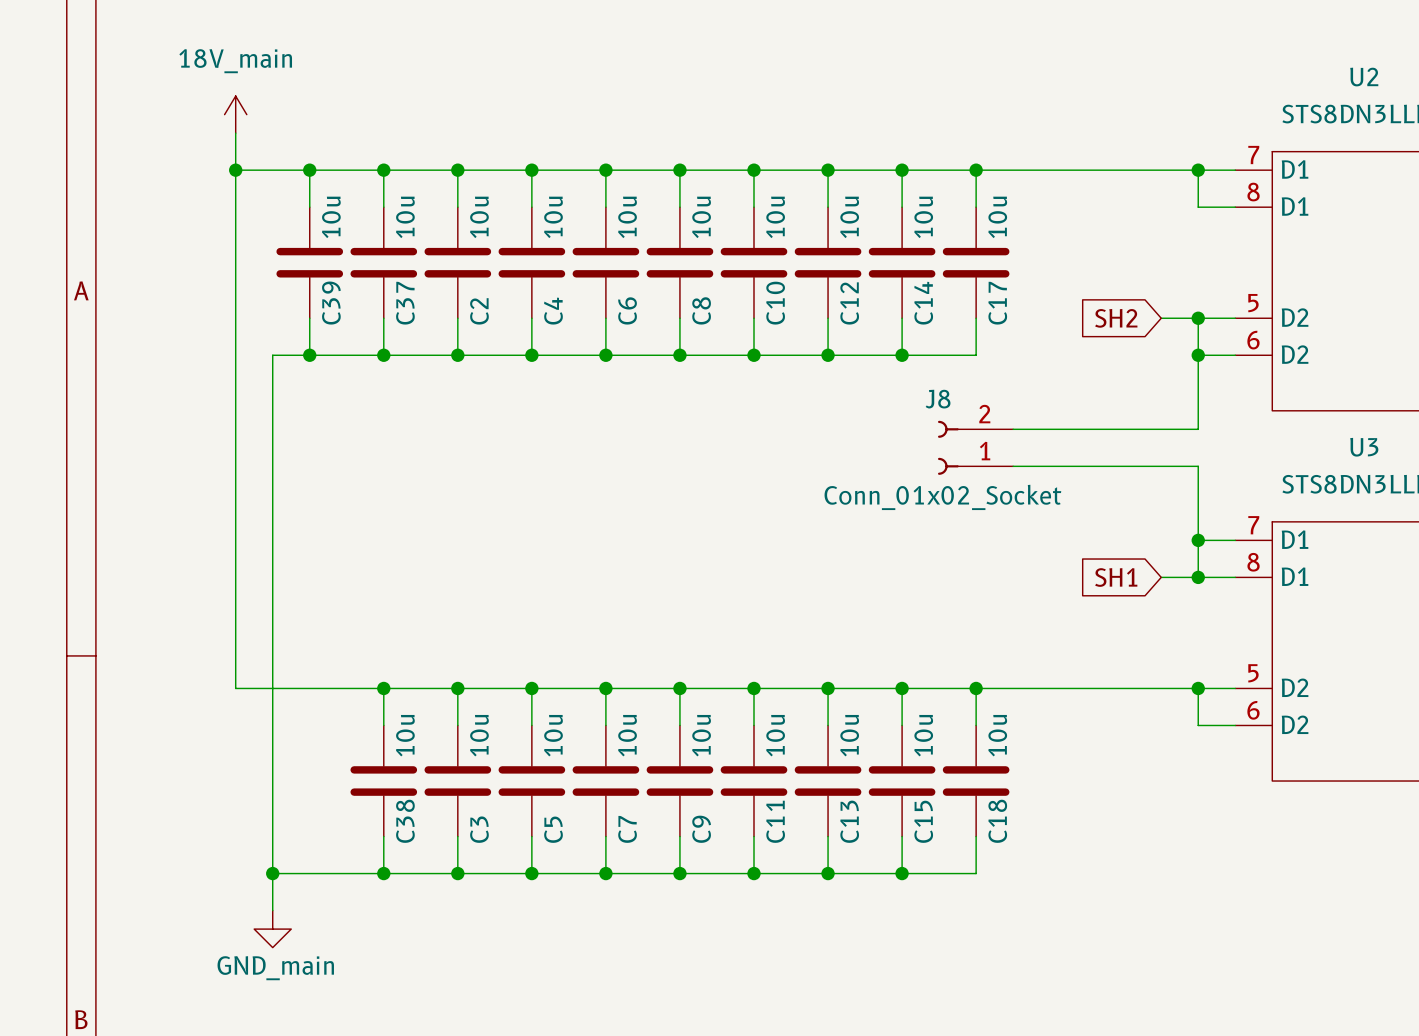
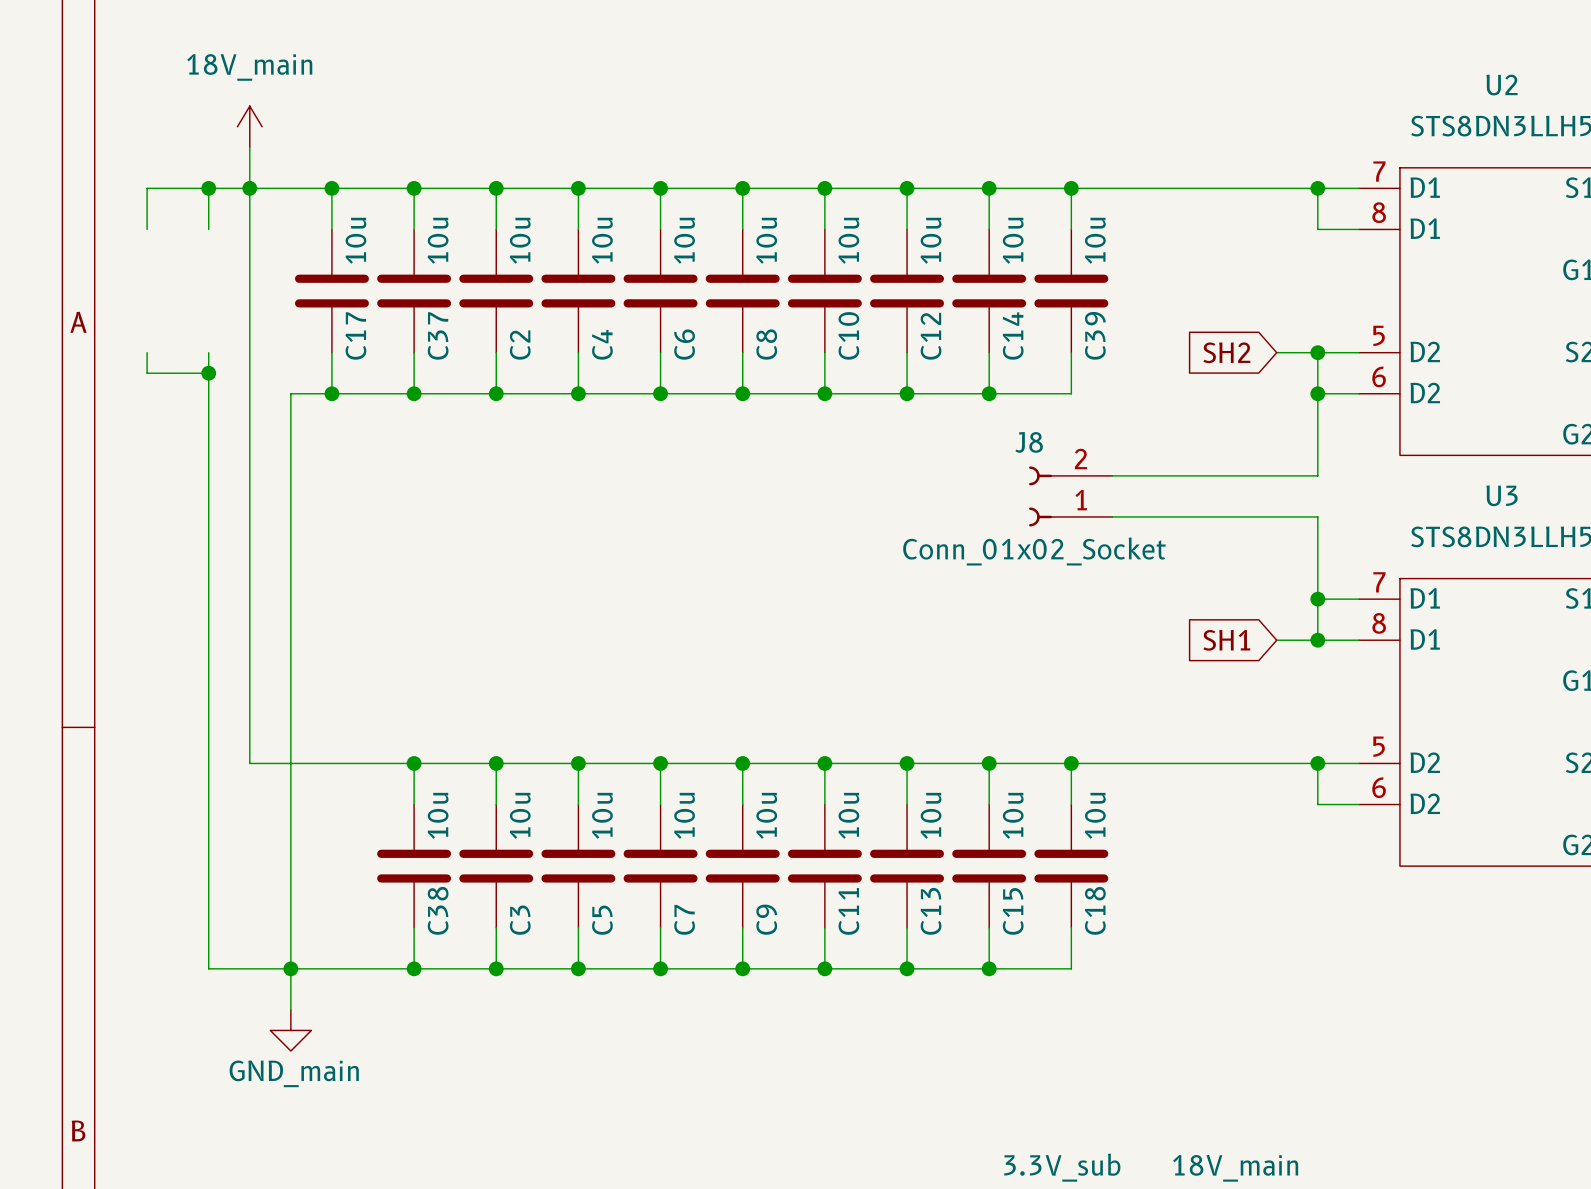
wire: none -> (208, 188) (208, 229)
junction: none -> (208, 188)
wire: none -> (249, 188) (147, 188) (147, 229)
C39 name: C39 (331, 303) -> C17 (355, 335)
C17 name: C17 (997, 303) -> C39 (1095, 335)
wire: none -> (147, 352) (147, 373) (208, 373)
wire: none -> (208, 352) (208, 968) (290, 968)
junction: none -> (208, 373)

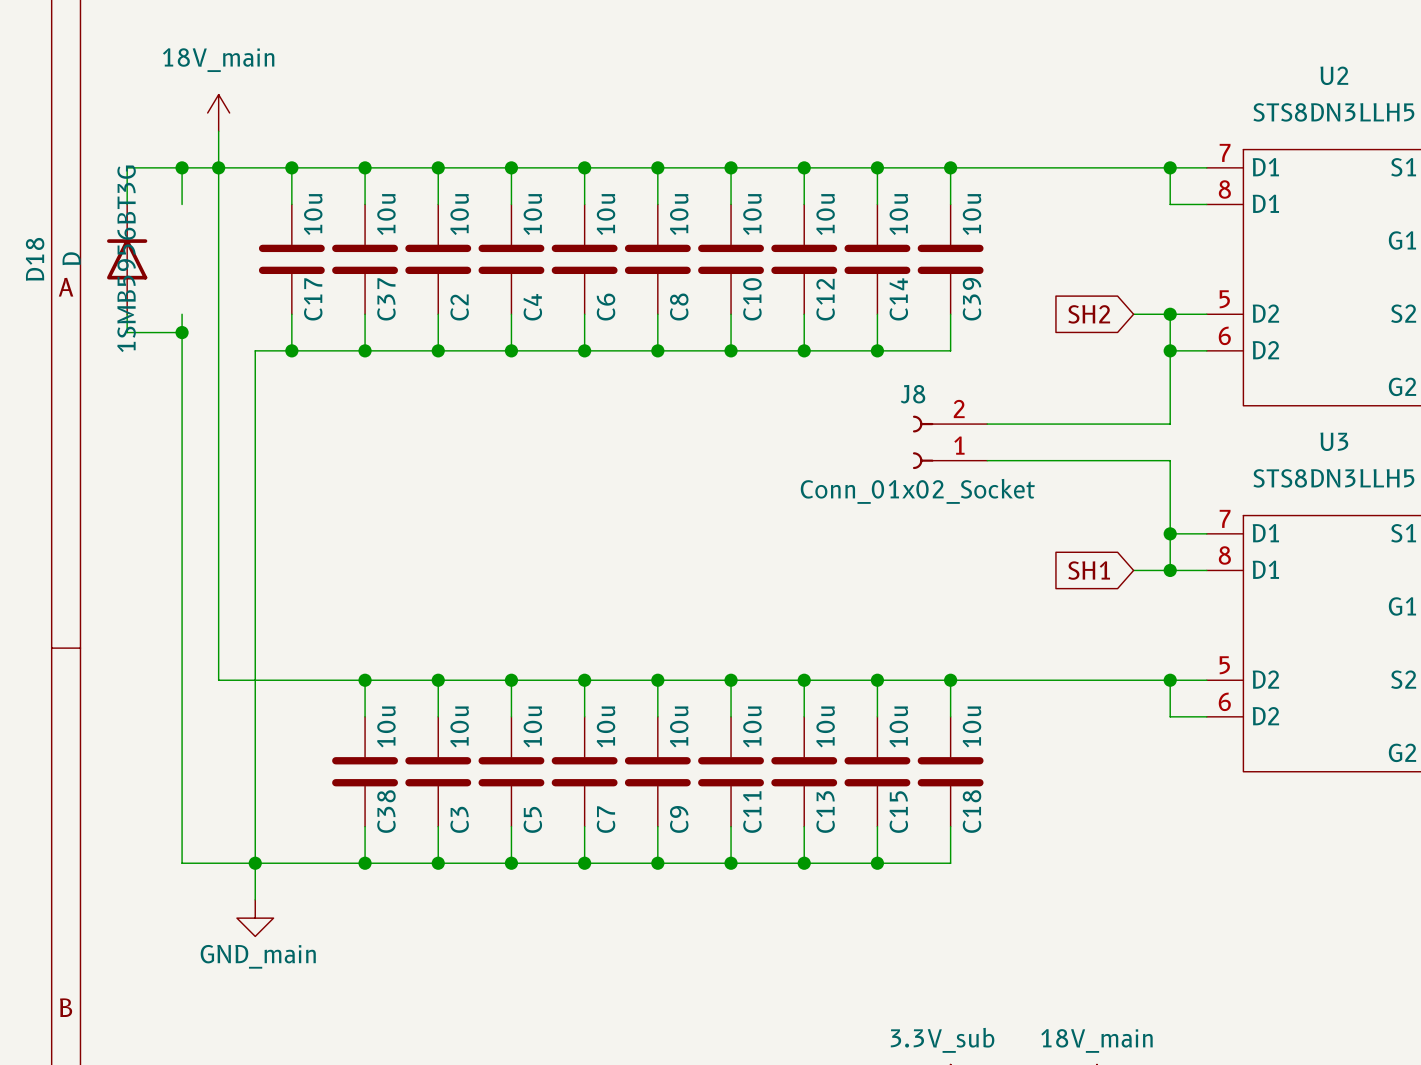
D18: none -> D (127, 259)

